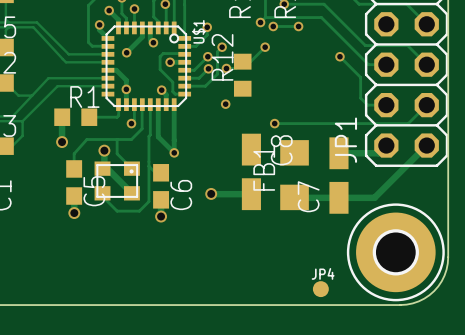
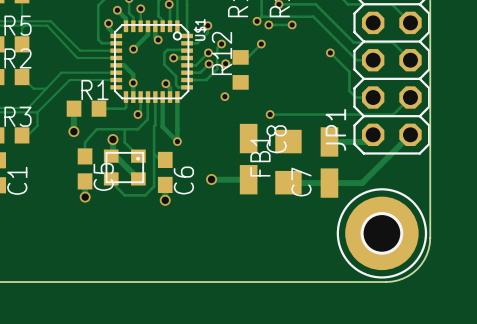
JP4: (320, 289) -> none

